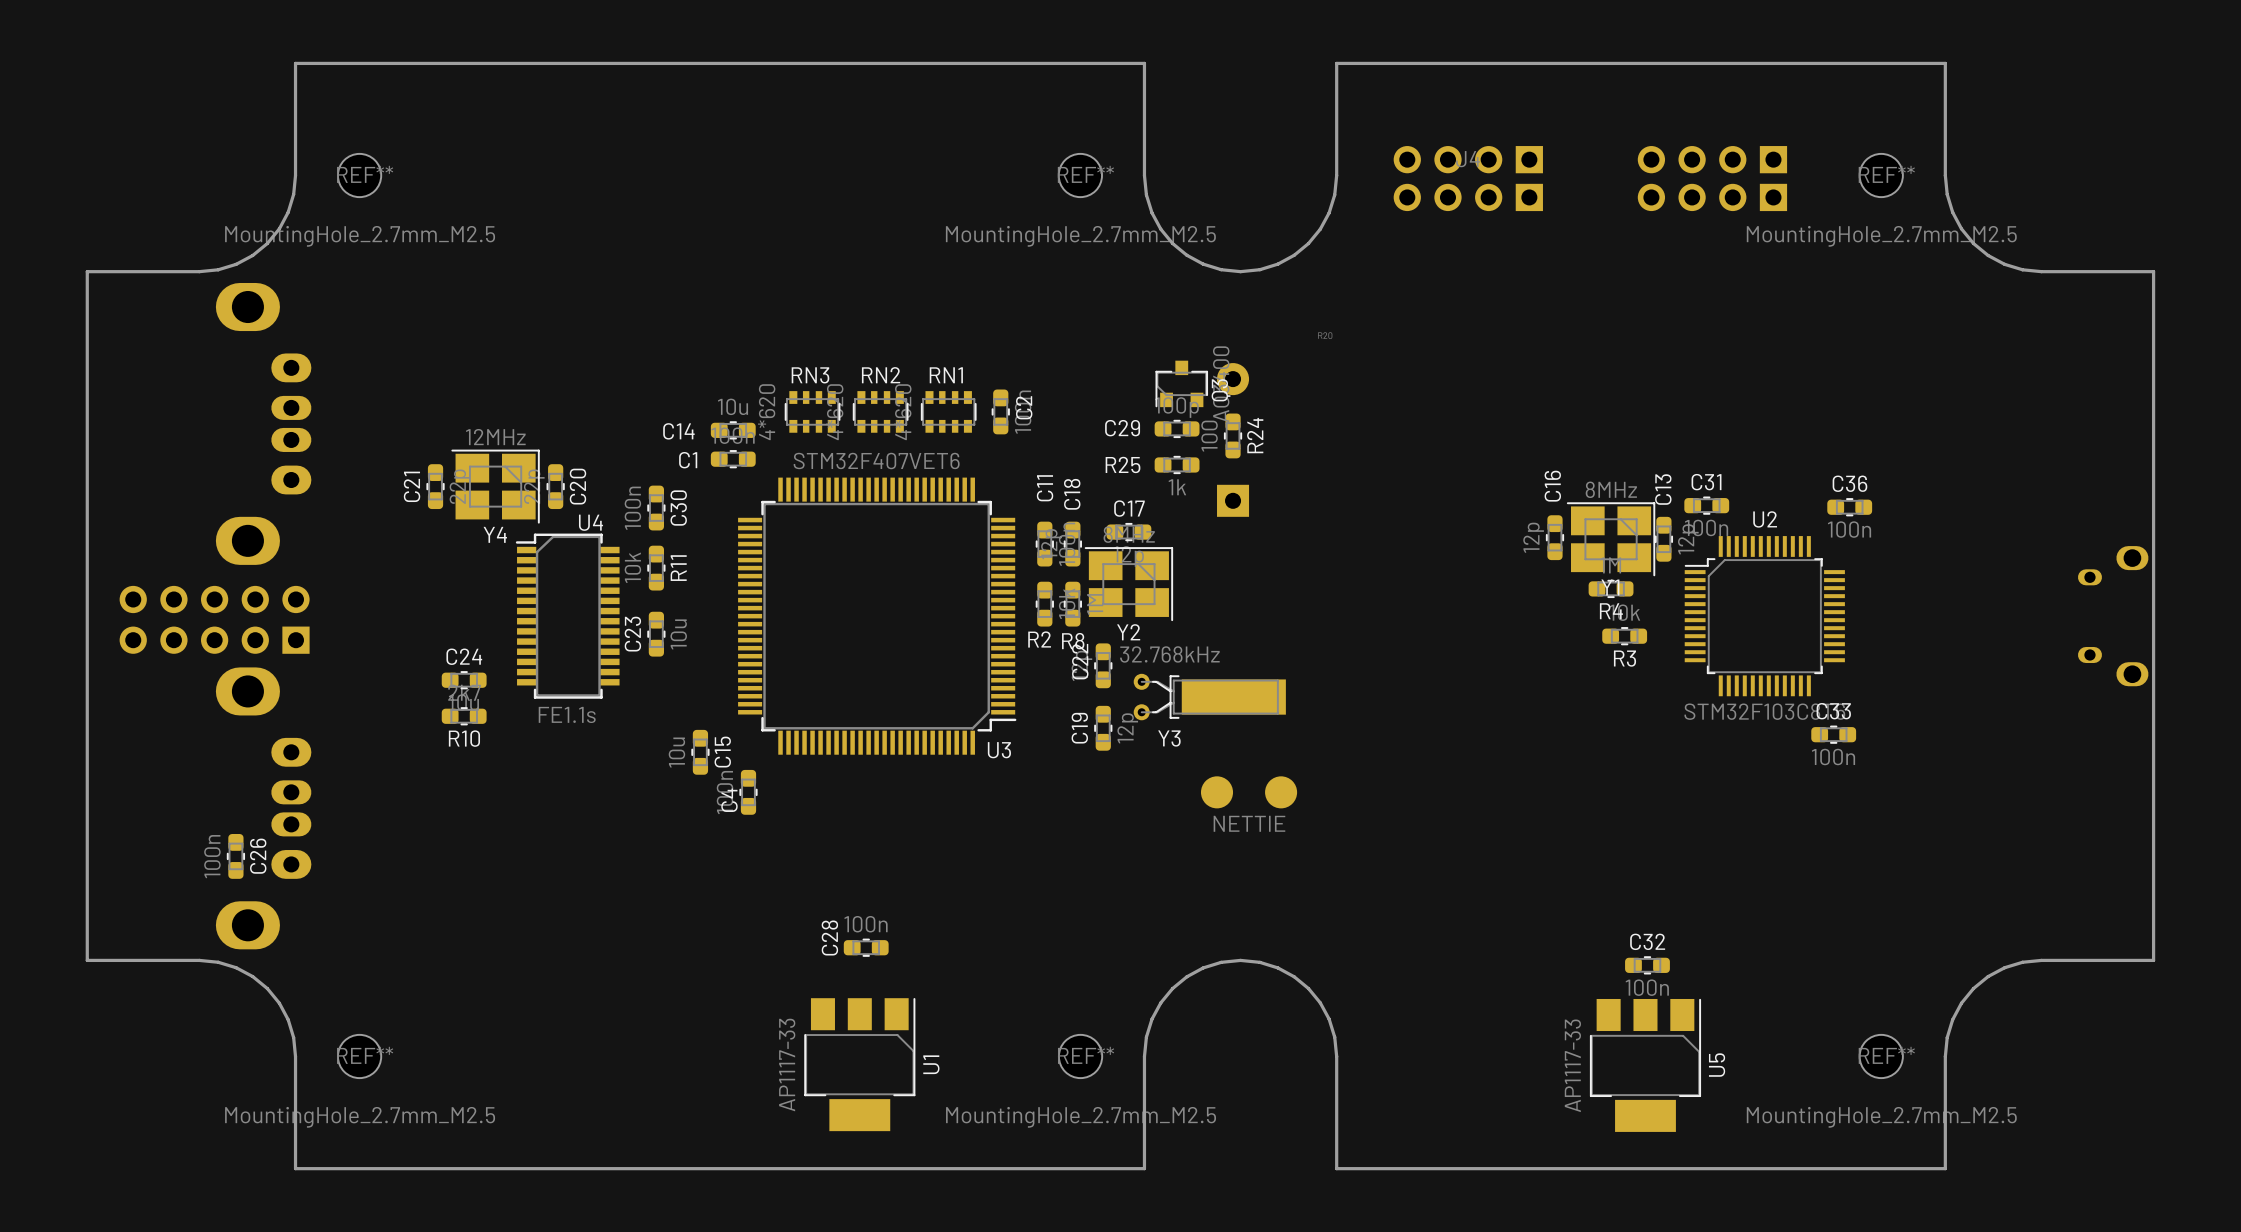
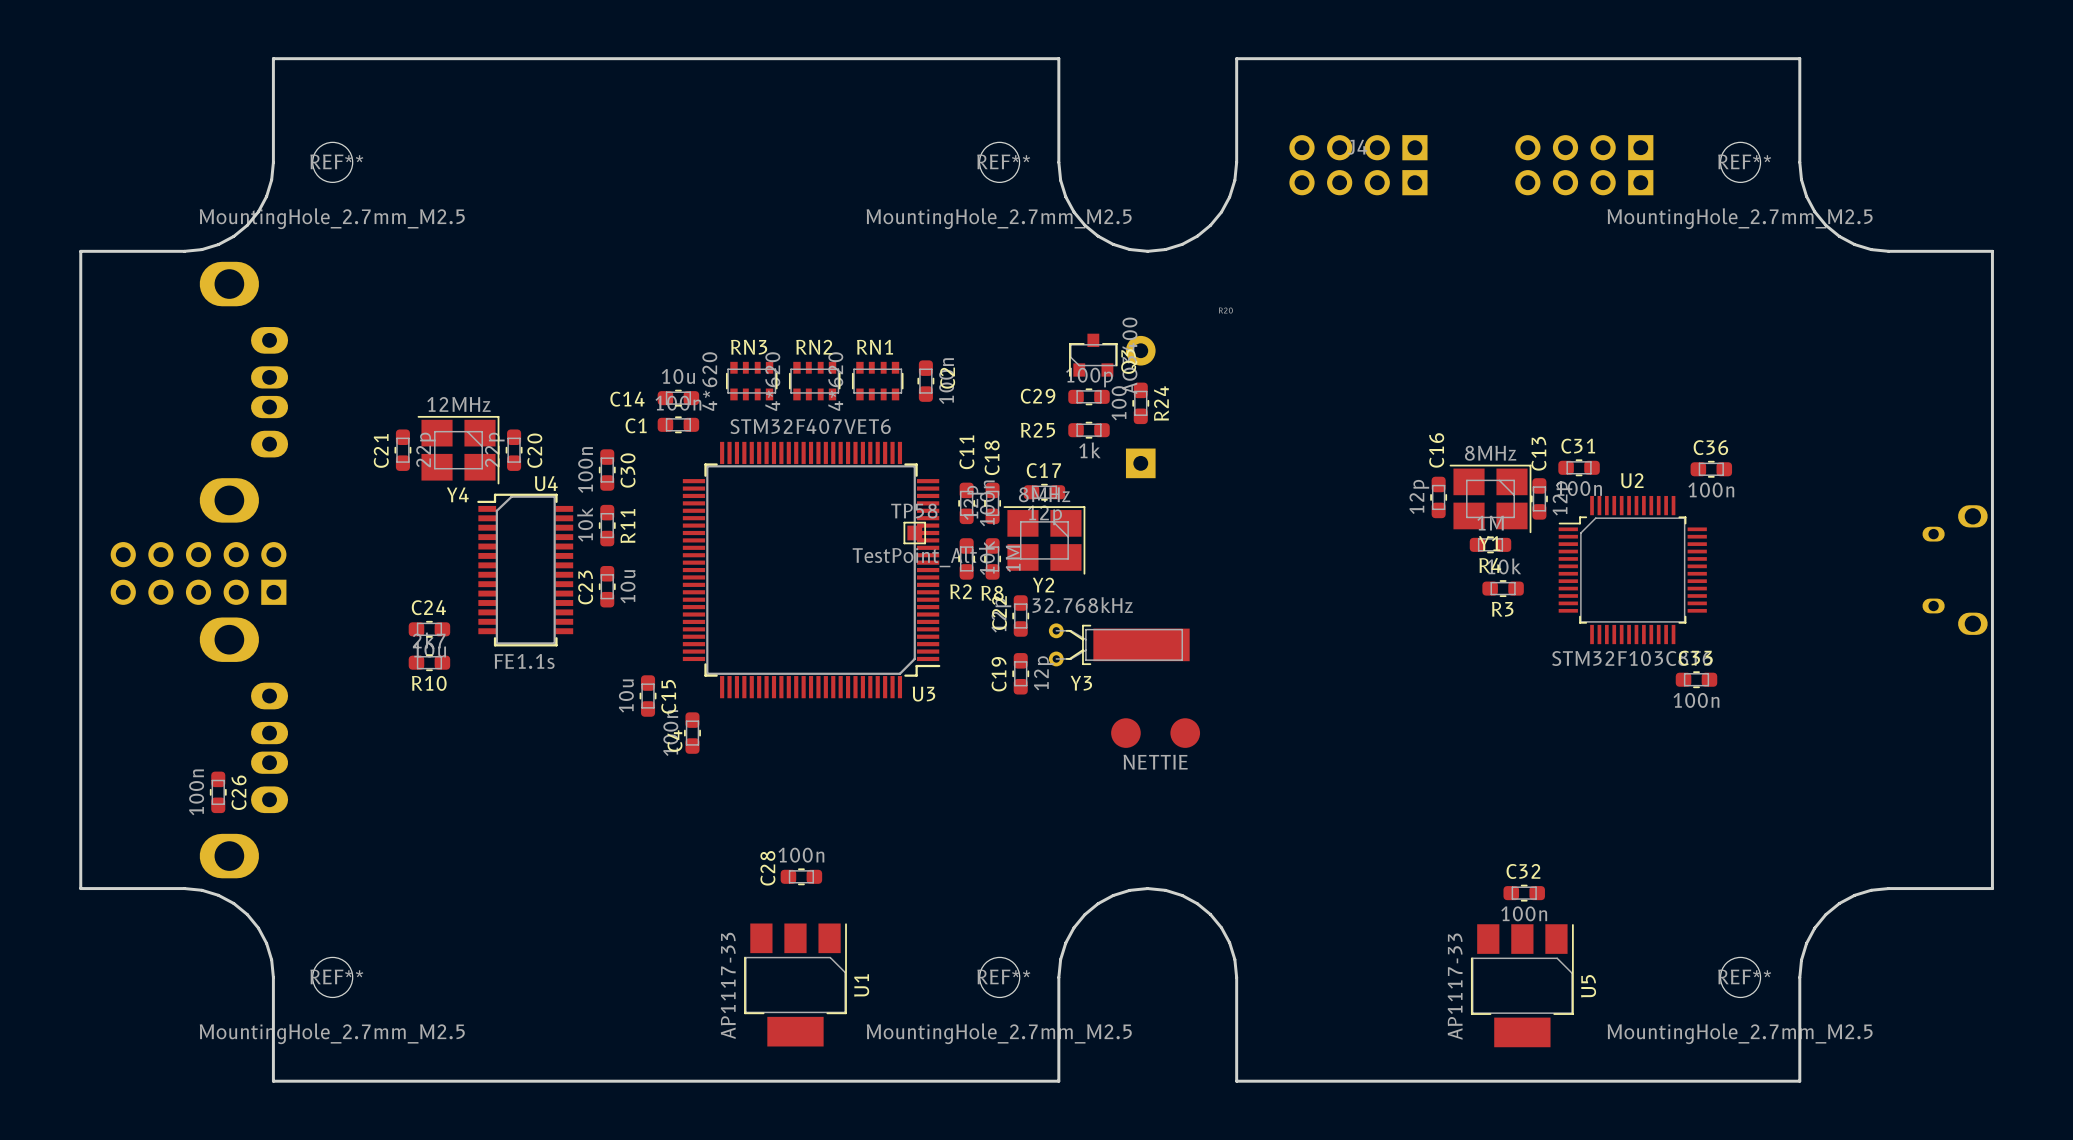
TP58: none -> TestPoint_Alt (914, 533)

